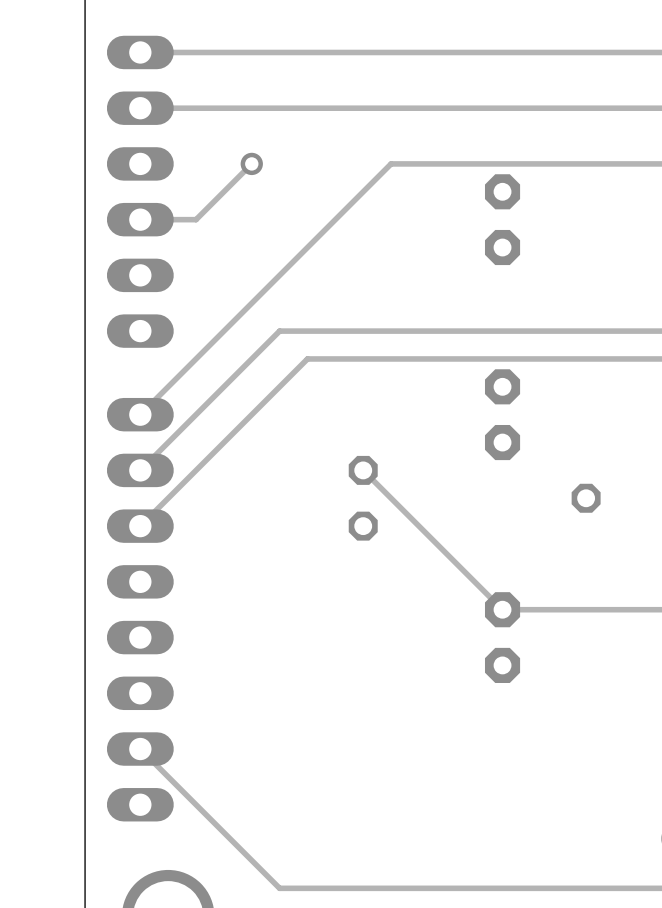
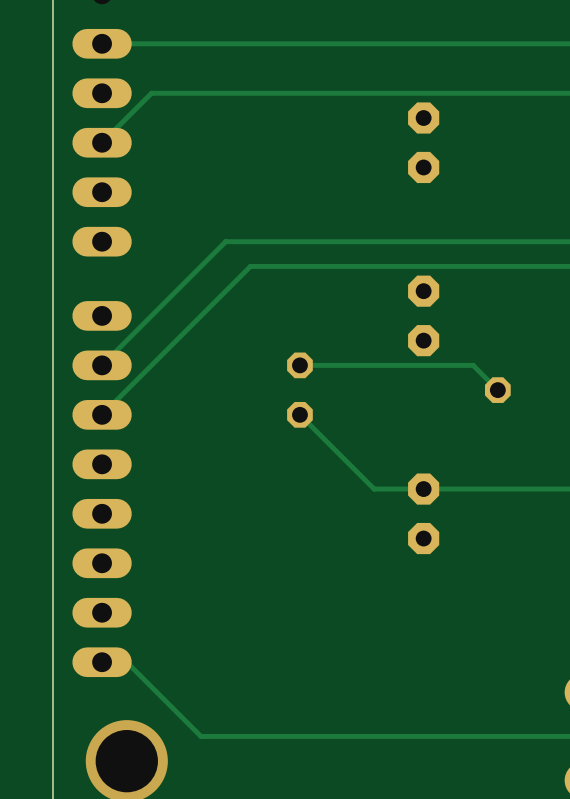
track: (251, 163) (196, 219) (140, 219) -> (324, 93) (151, 93) (102, 142)
via: (251, 163) -> none
track: (391, 163) (140, 414) -> none
track: (363, 470) (502, 609) -> (299, 414) (374, 489) (423, 489)
track: none -> (299, 365) (473, 365) (497, 390)
track: (140, 749) (279, 888) -> (102, 662) (126, 662) (201, 736) (225, 736)

